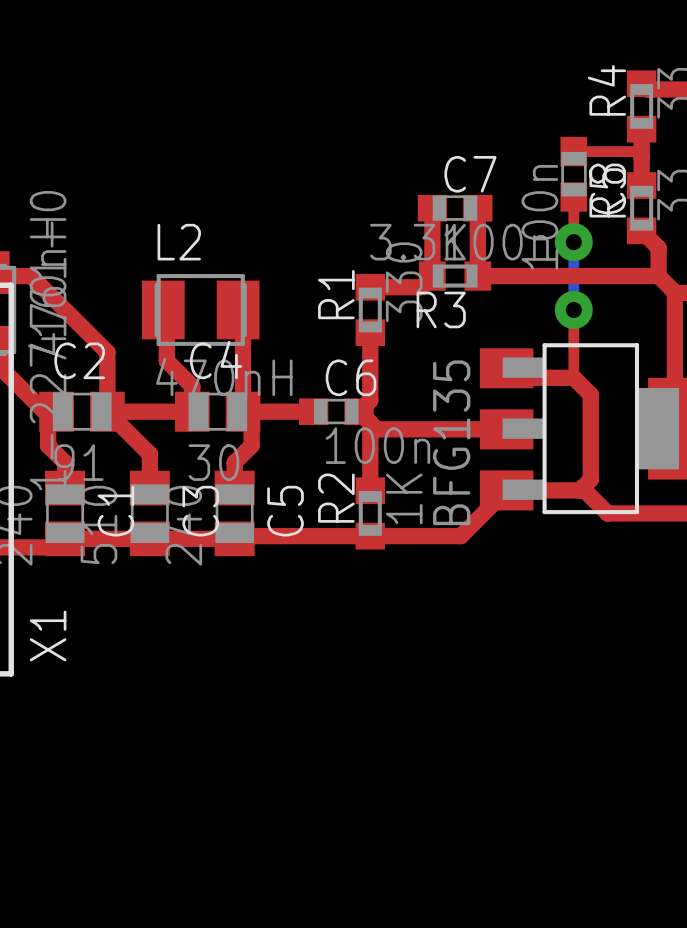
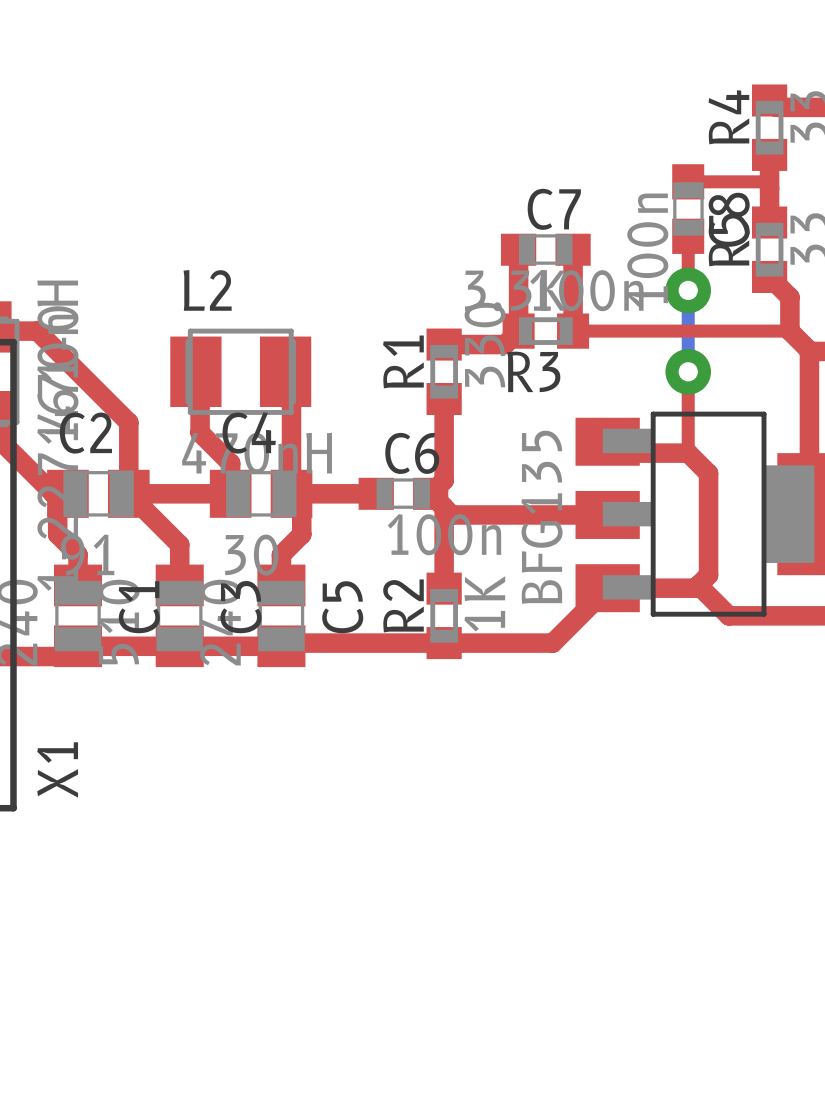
top track width: thick (477, 276) (658, 276) -> thin (573, 331) (789, 331)

